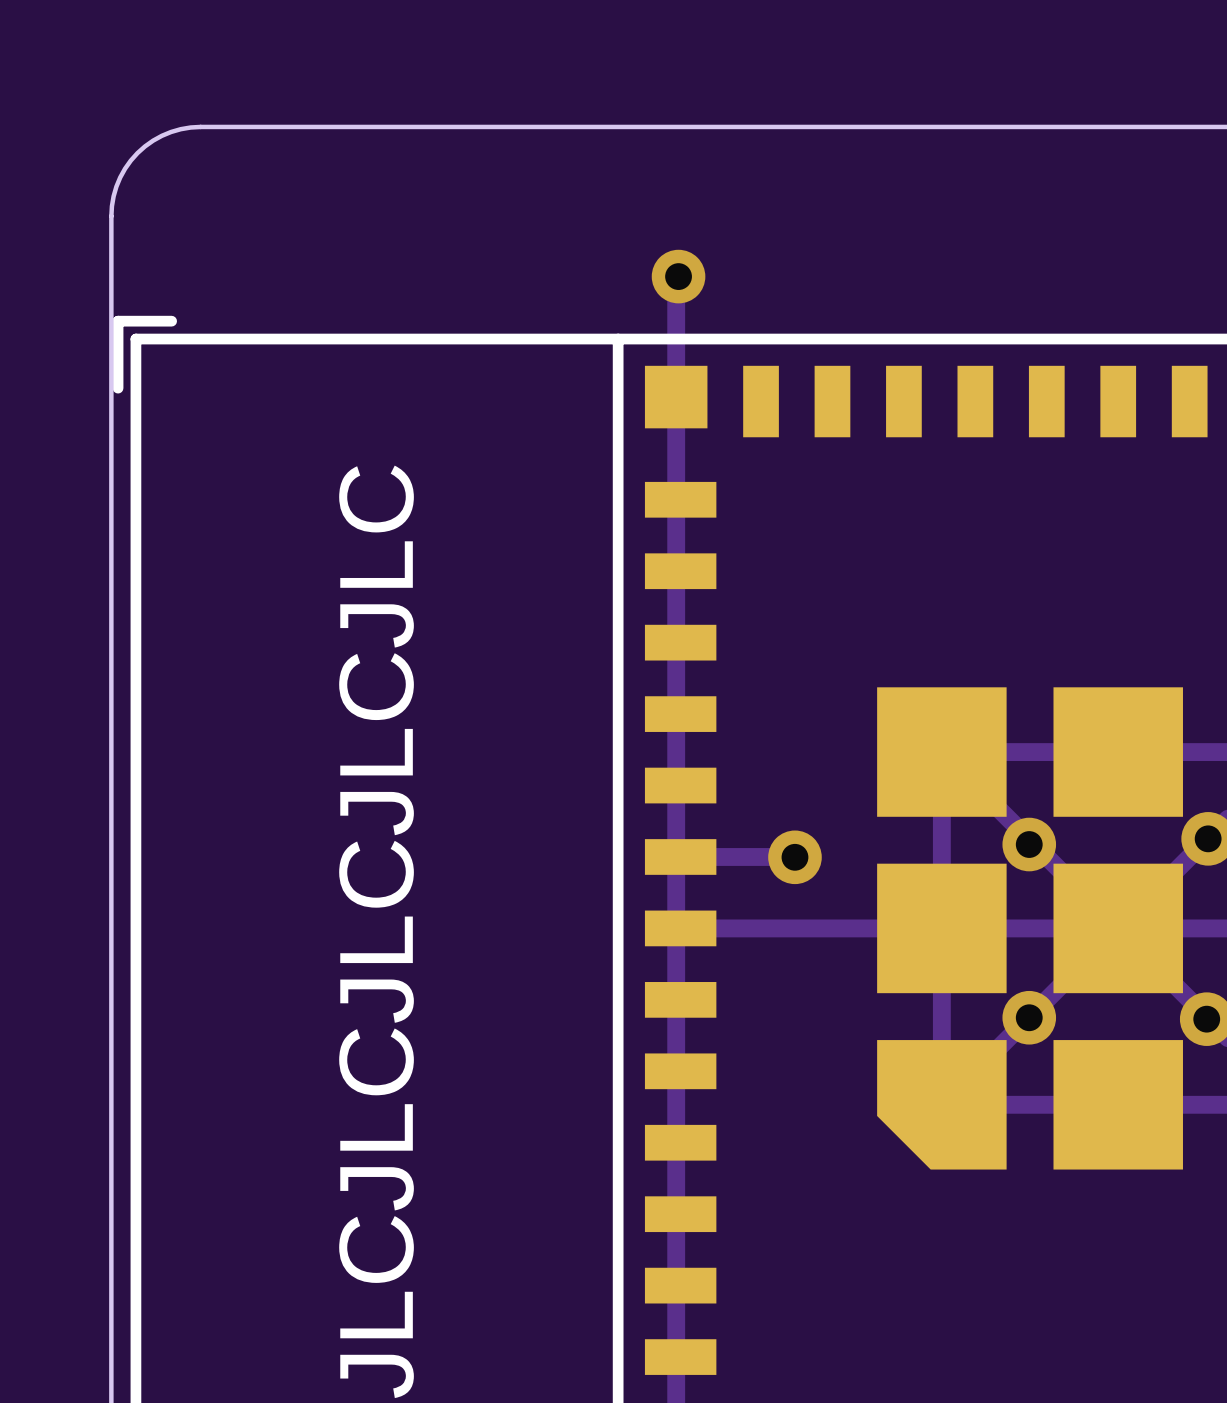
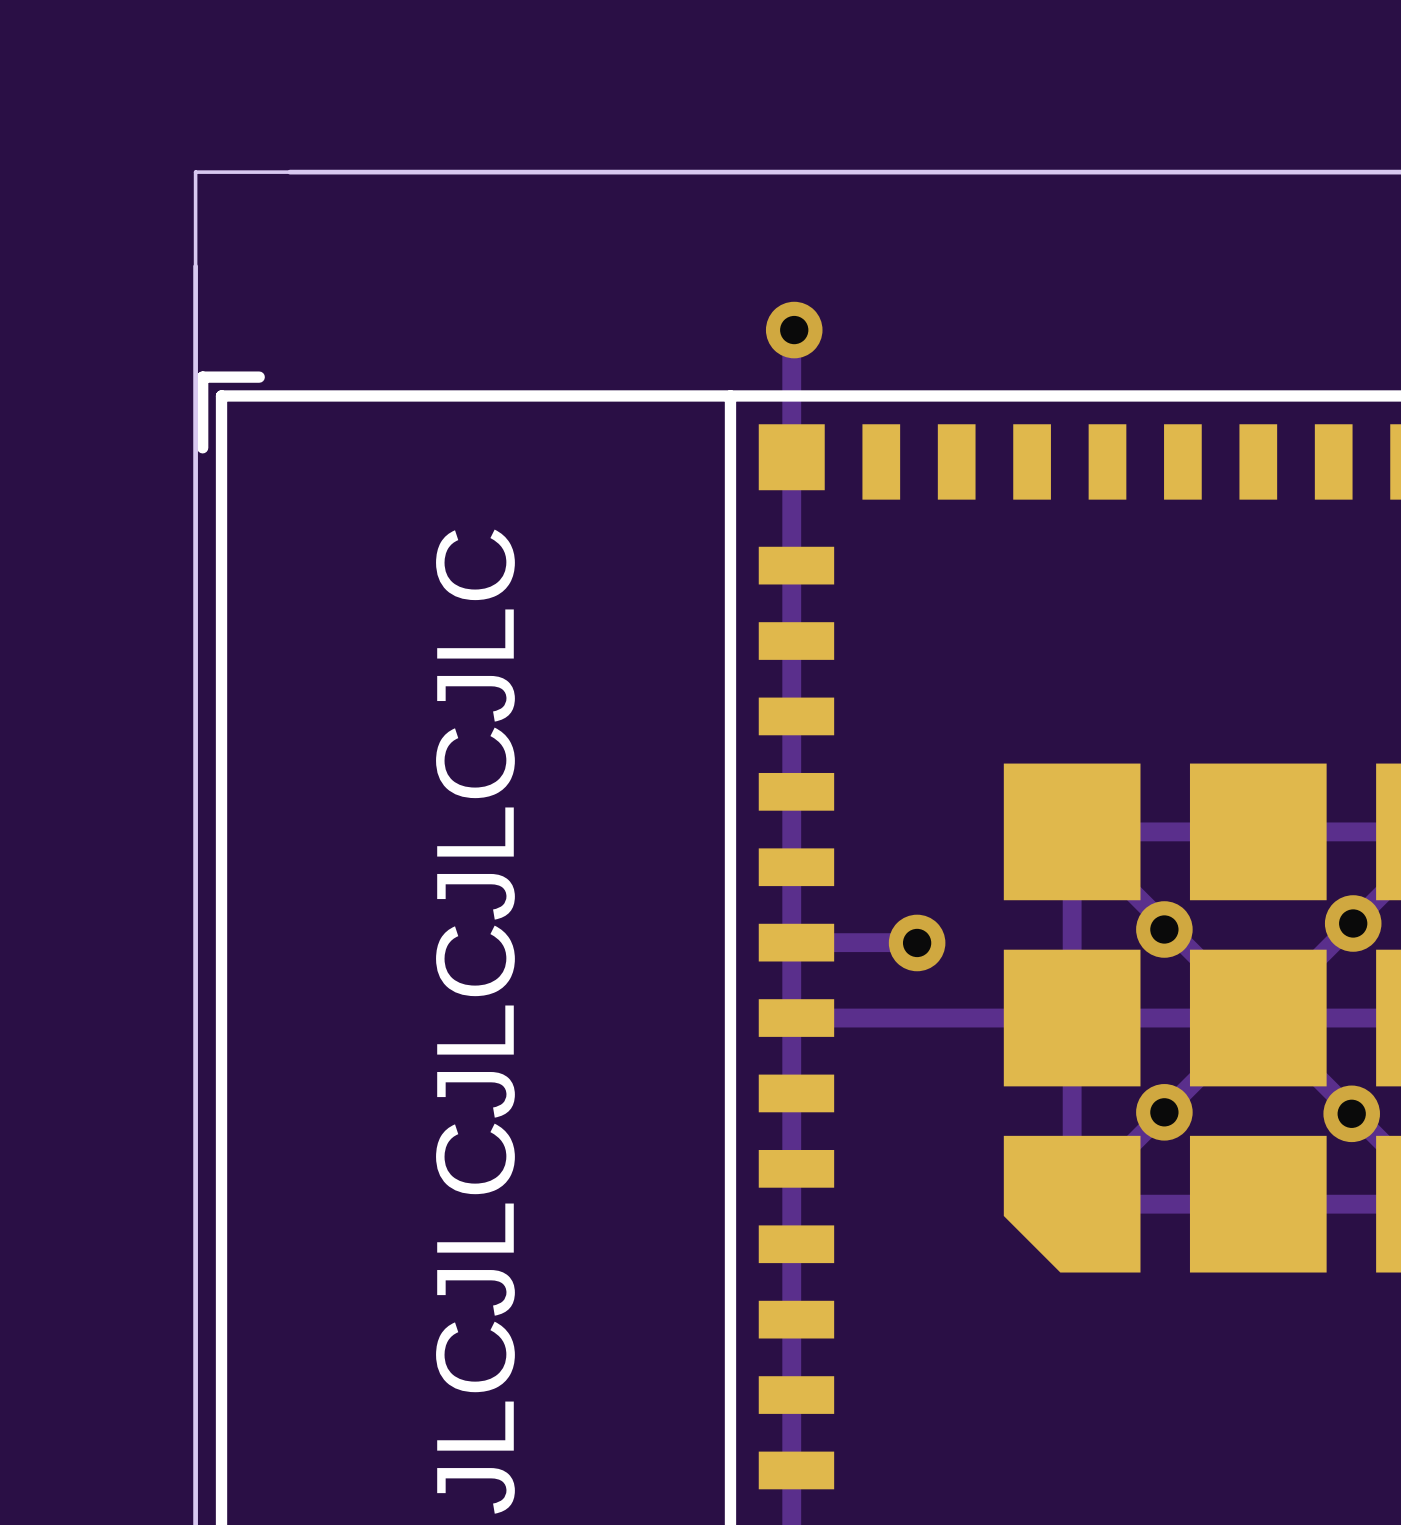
board edge: (200, 126) (171, 131) (153, 140) (137, 153) (125, 168) (116, 186) (111, 216) -> (289, 172) (195, 172) (195, 266)

